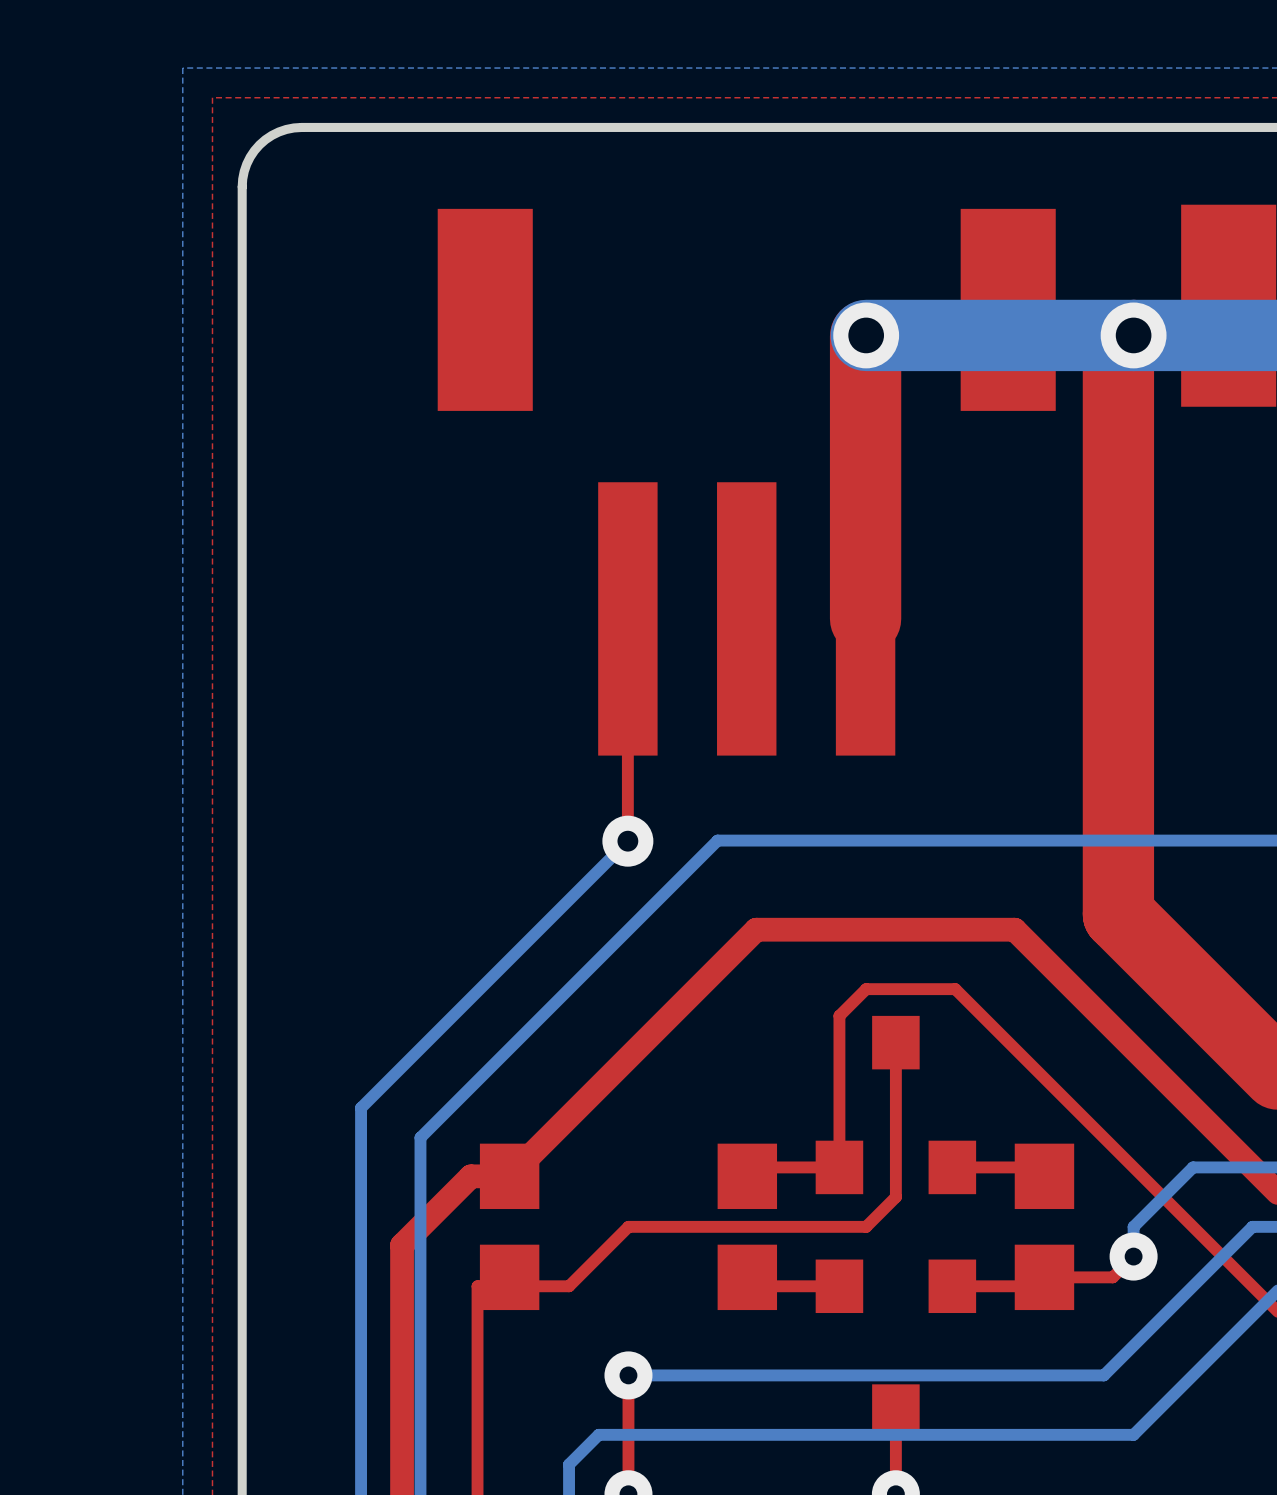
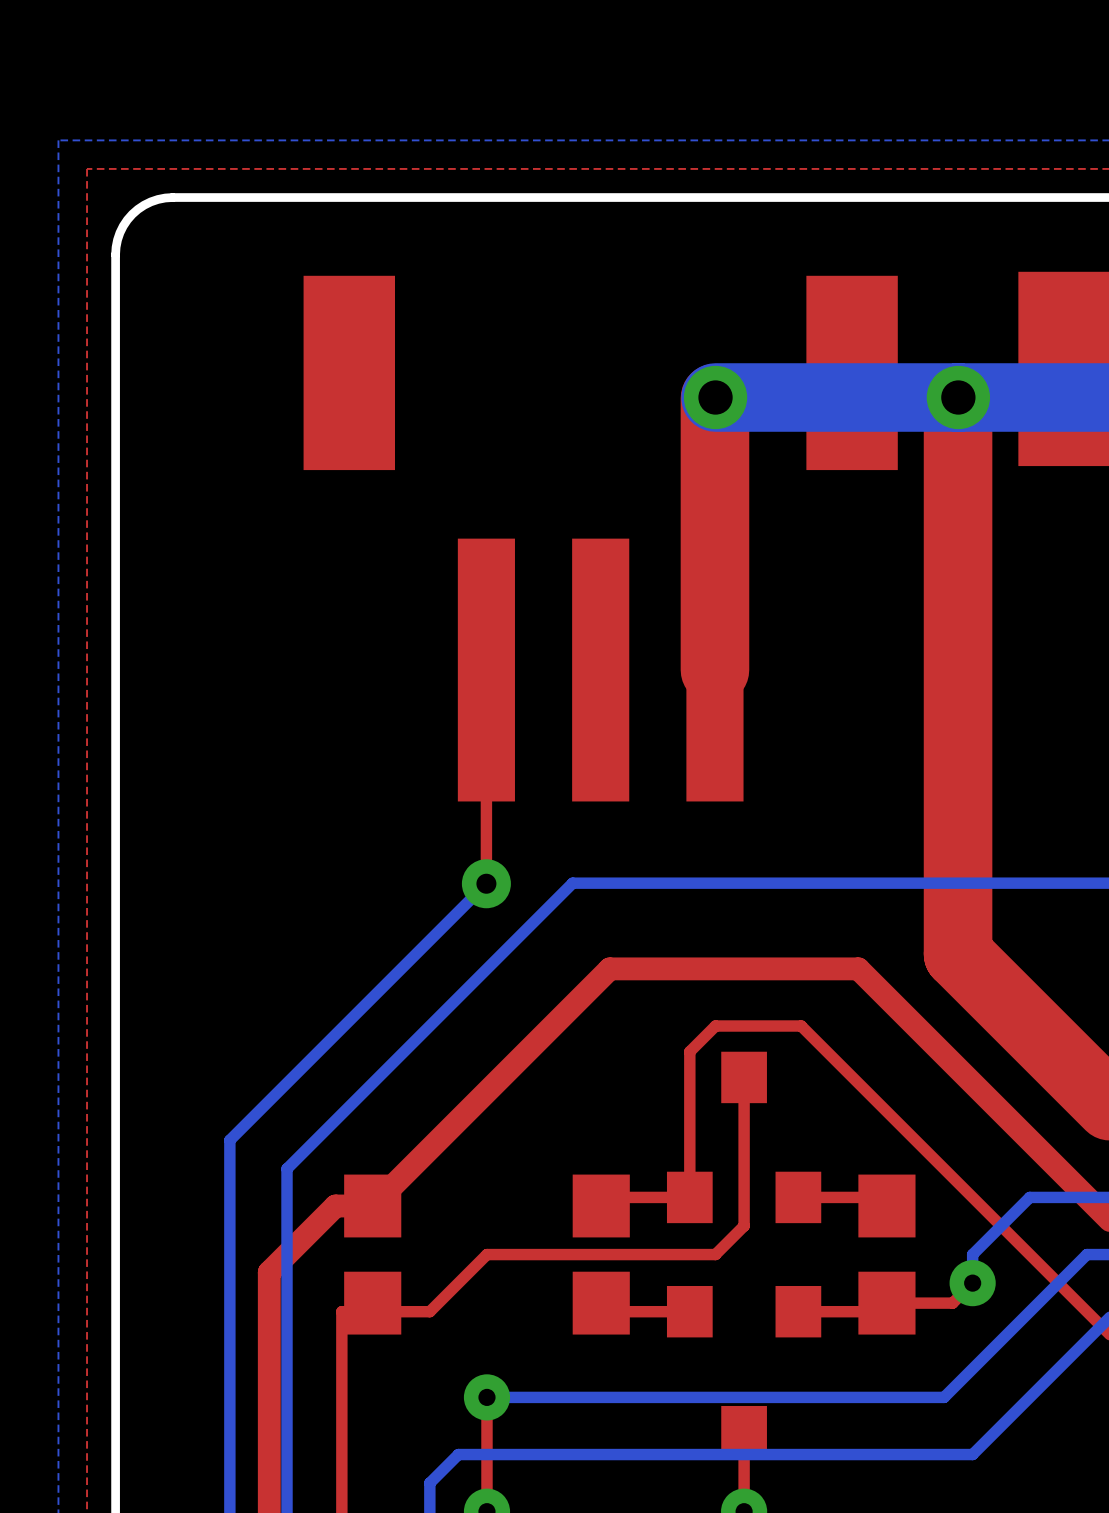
via position: (1133, 335) -> (958, 397)

